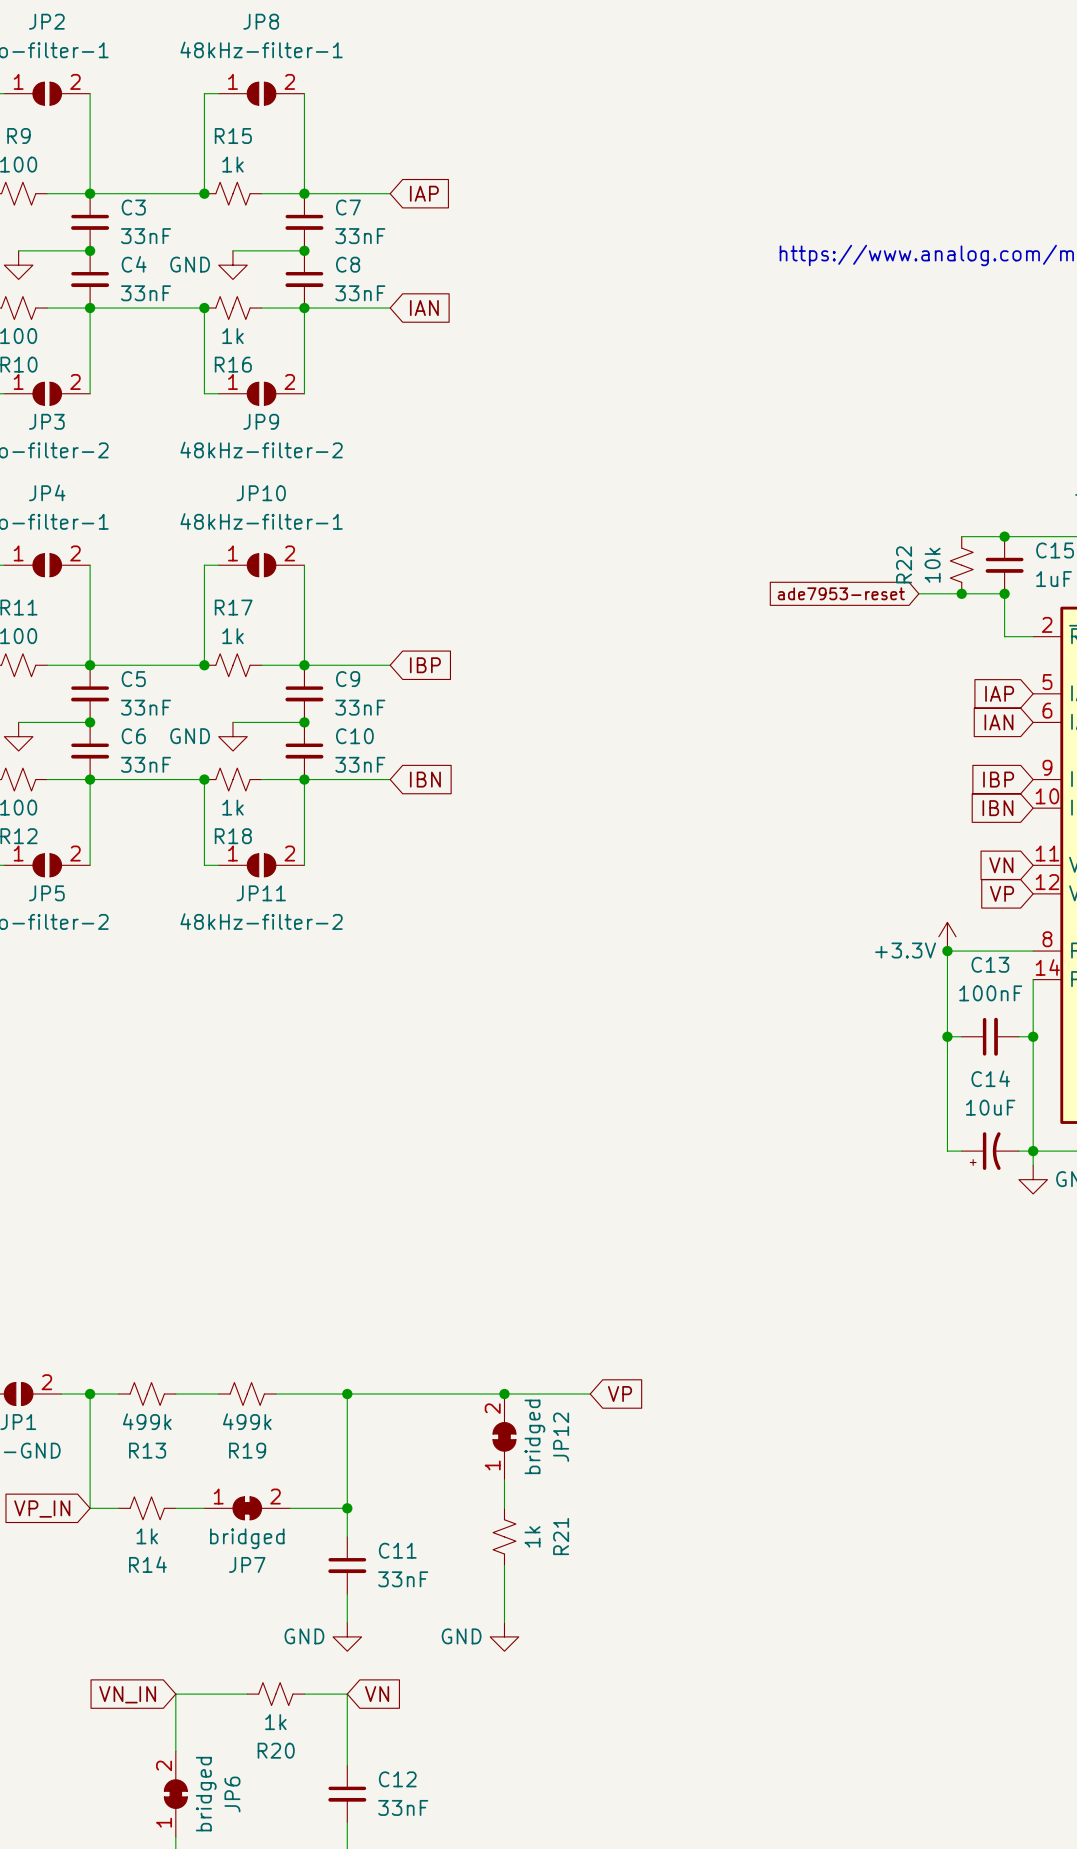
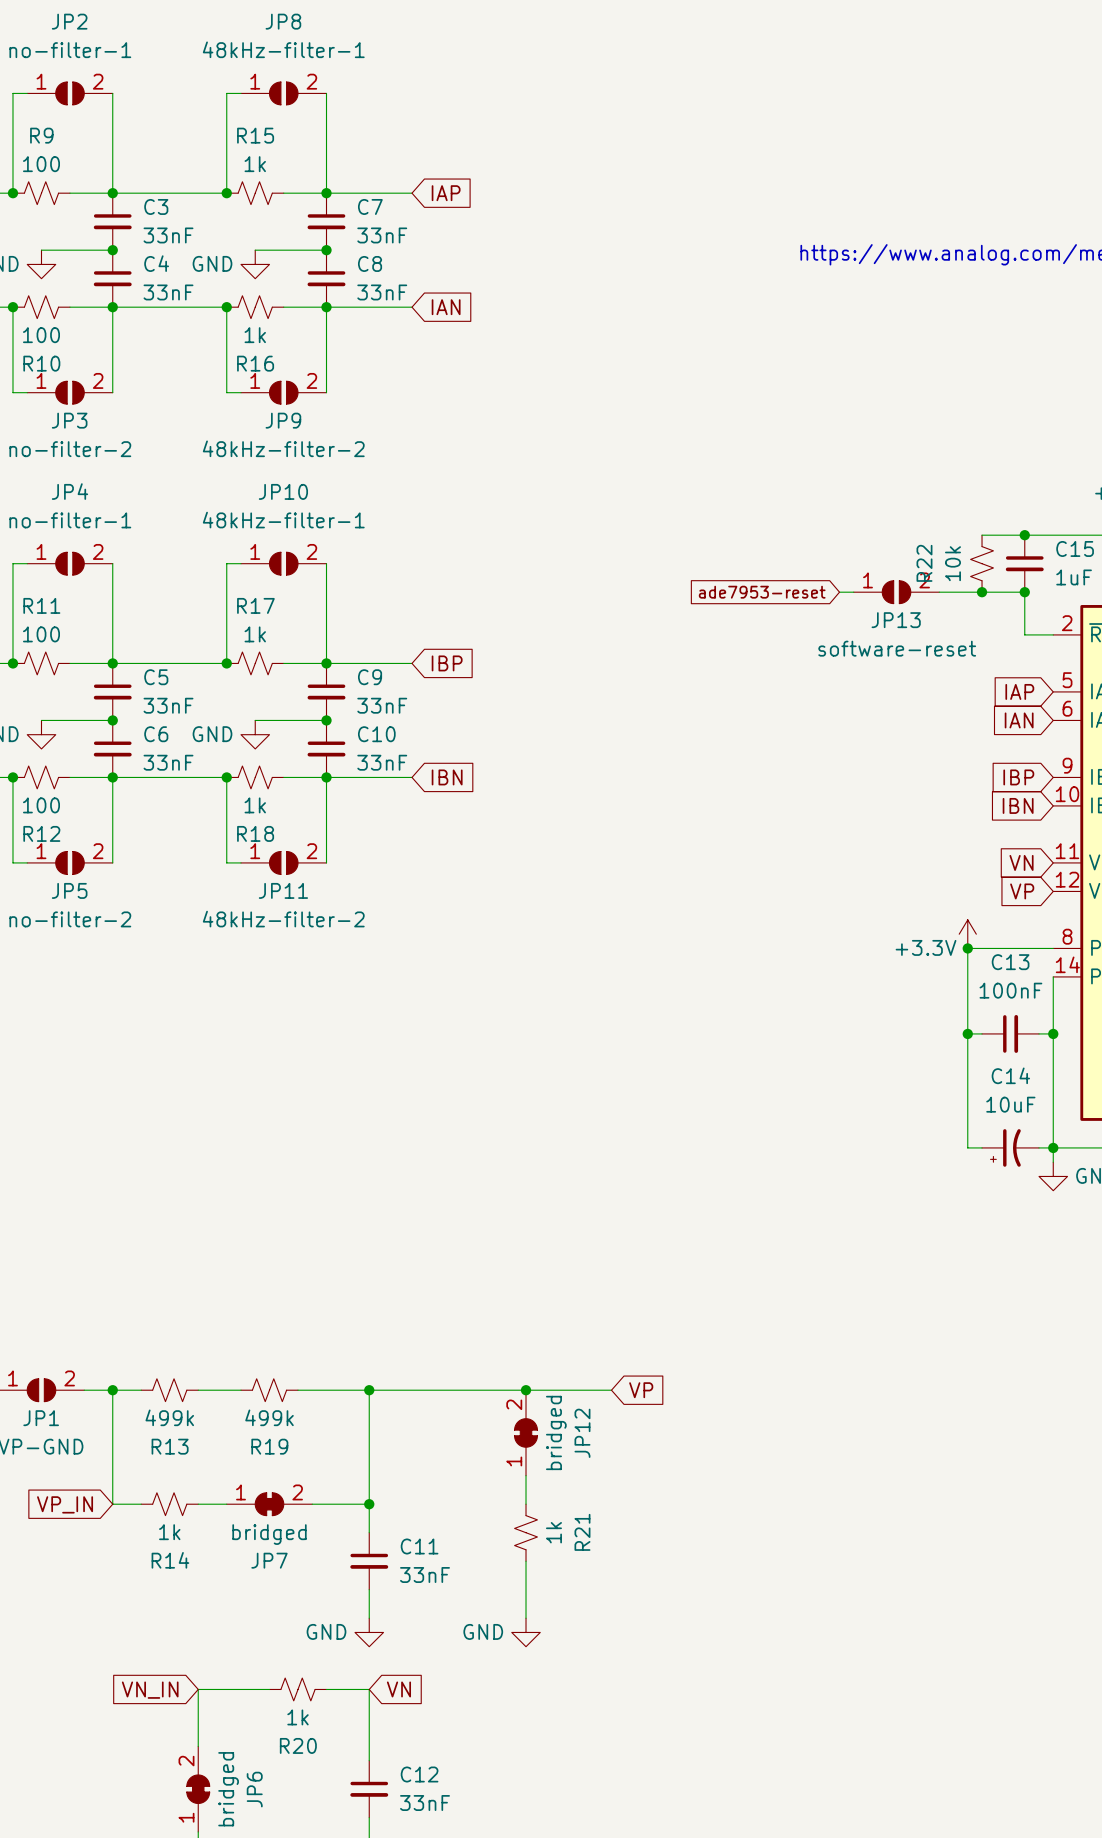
wire: none -> (839, 592) (853, 592)
global label position: ade7953-reset (841, 593) -> ade7953-reset (762, 592)
JP13: none -> software-reset (896, 592)

